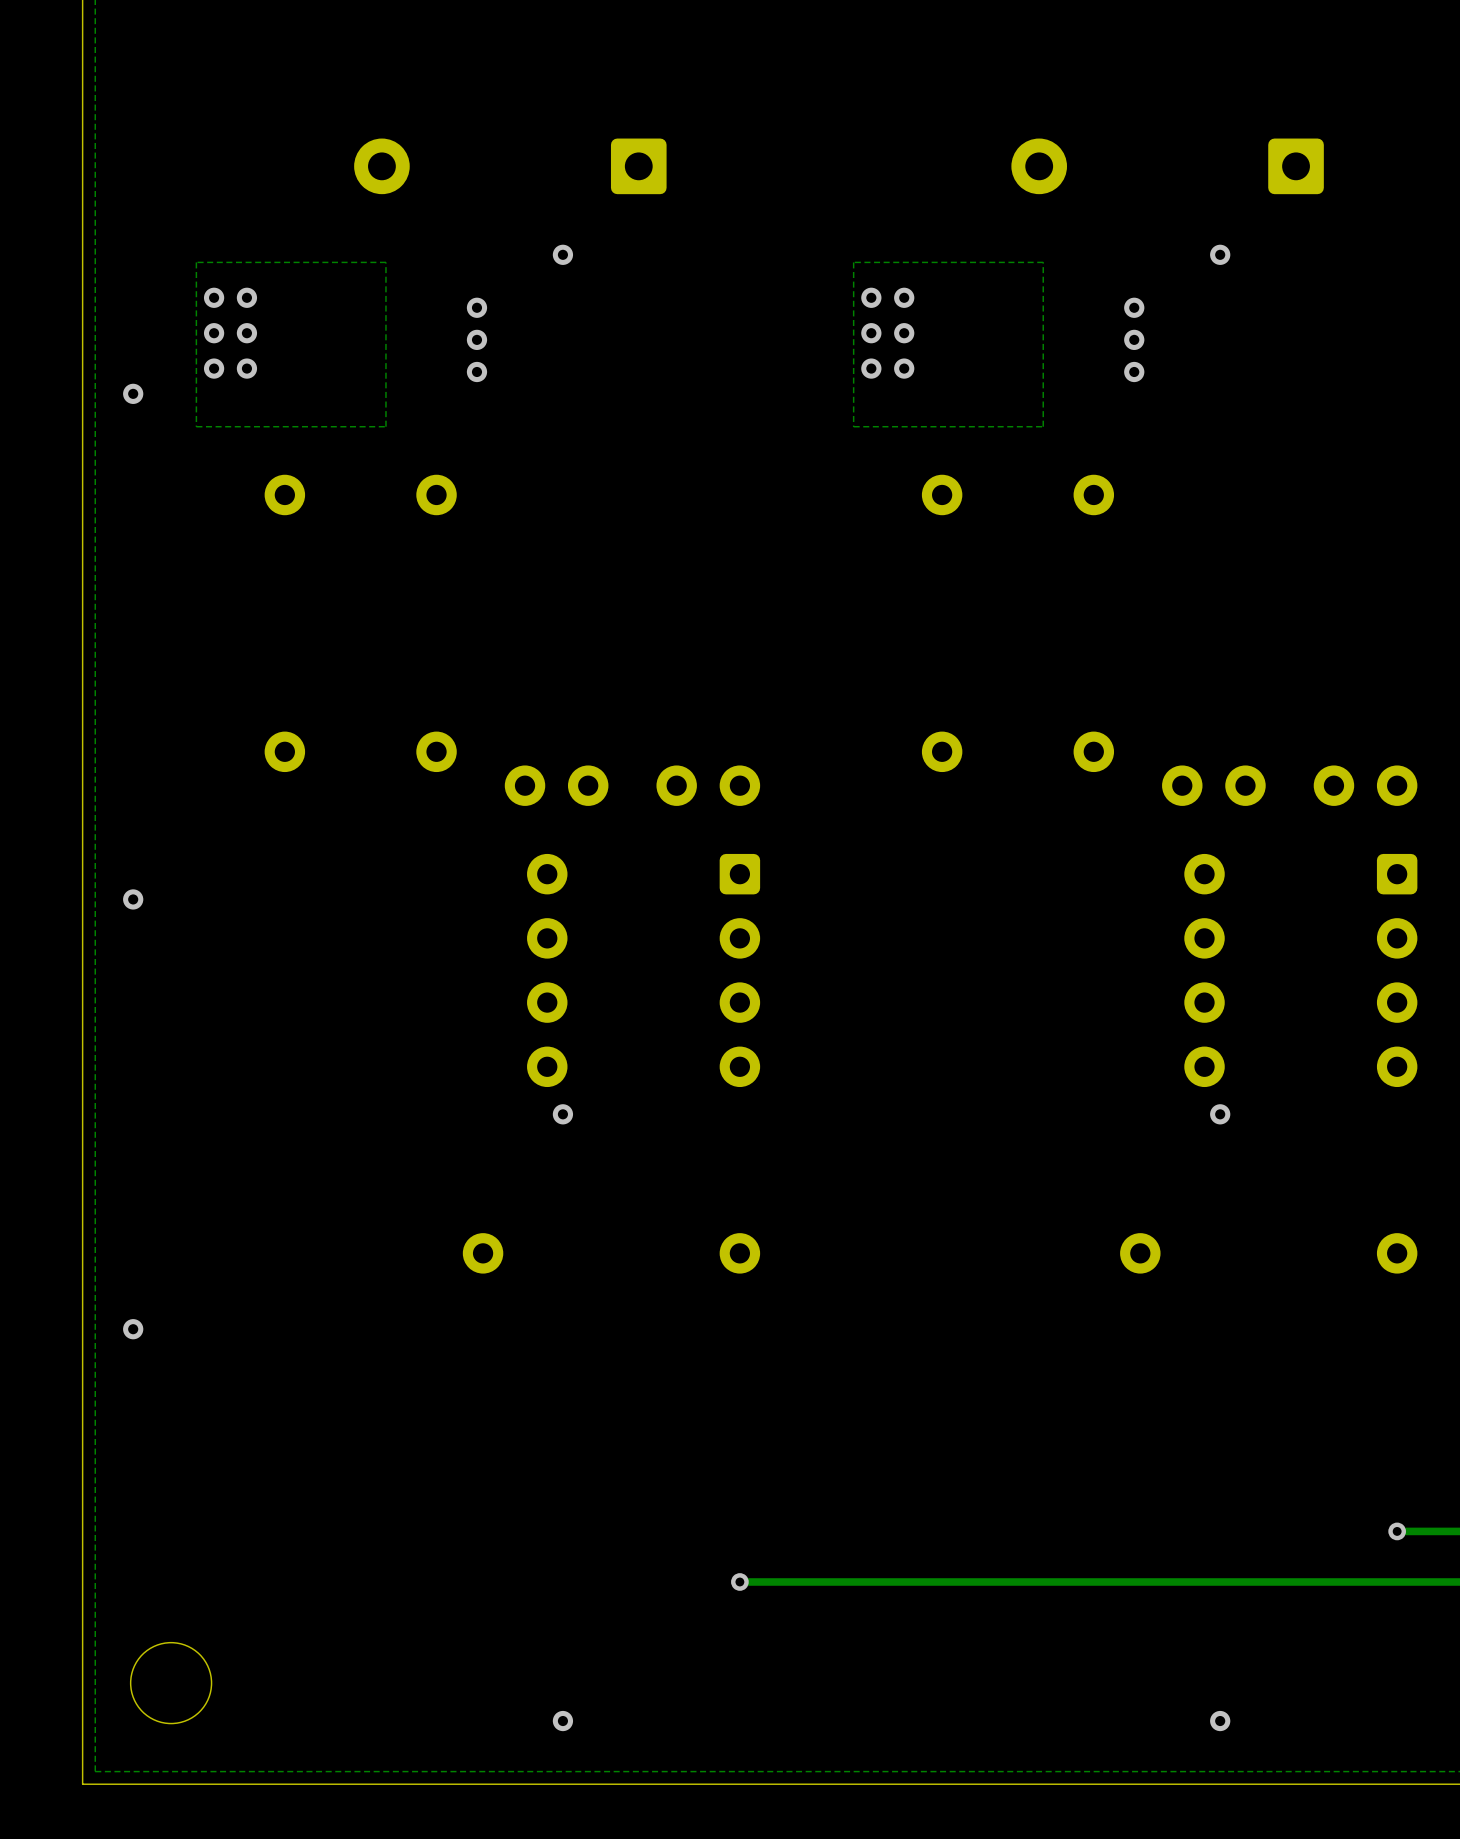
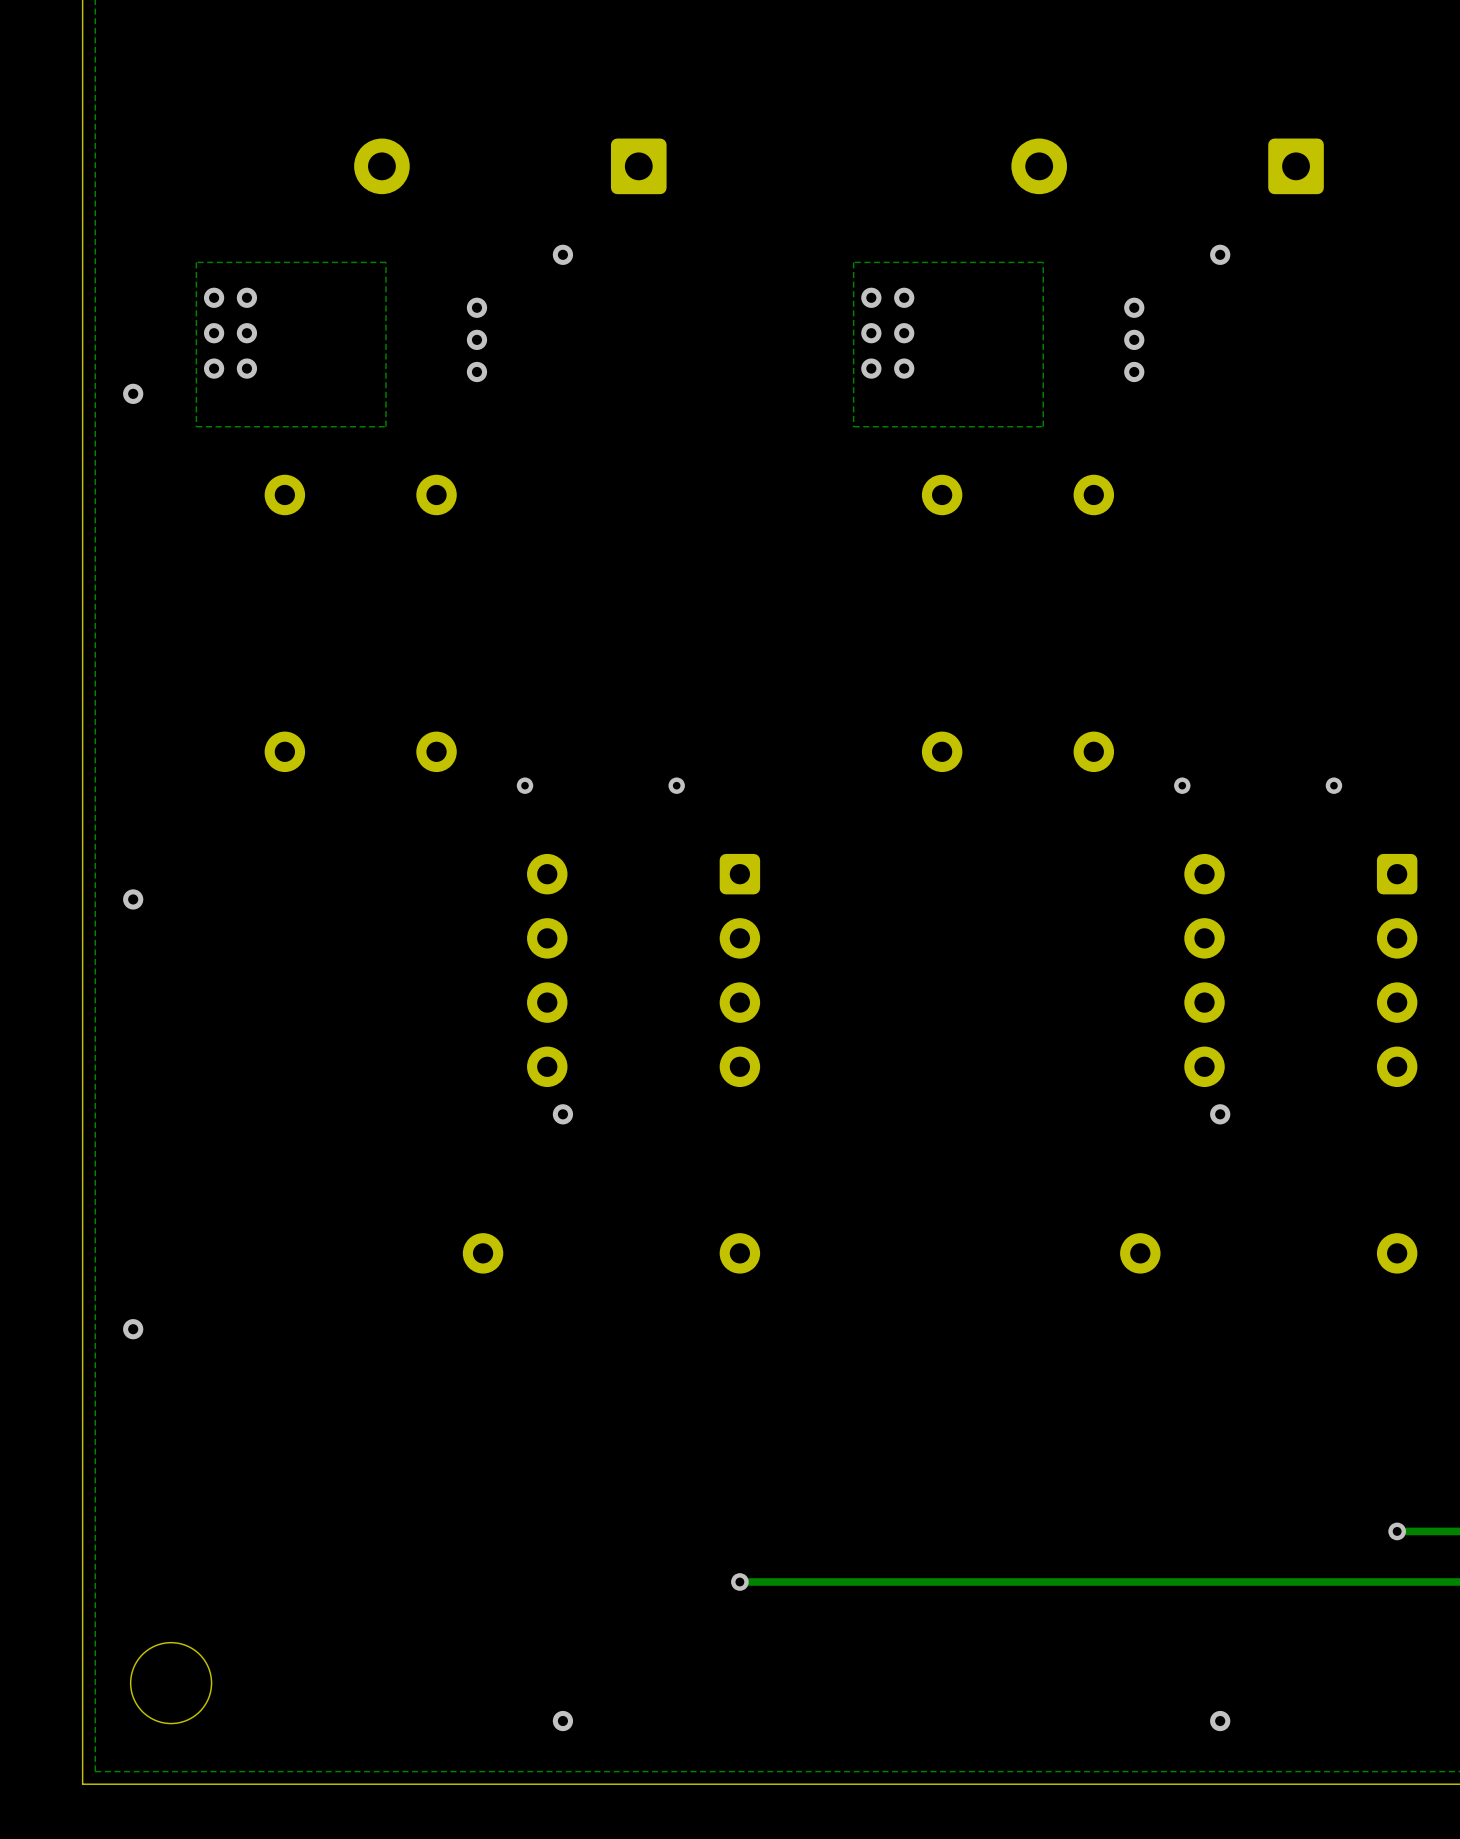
via: none -> (525, 785)
part: (556, 785) -> none
via: none -> (676, 785)
part: (708, 785) -> none
via: none -> (1182, 785)
part: (1213, 785) -> none
via: none -> (1333, 785)
part: (1365, 785) -> none

